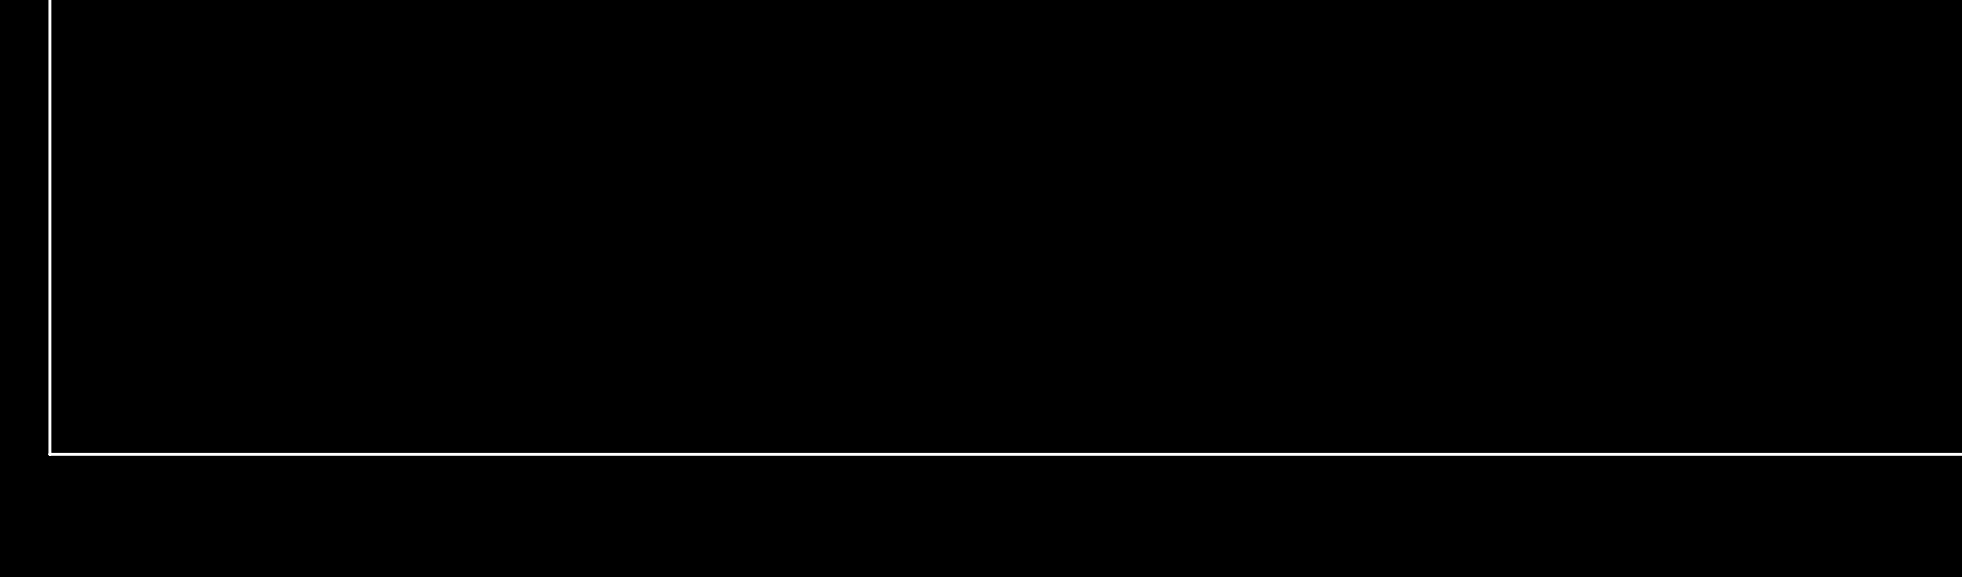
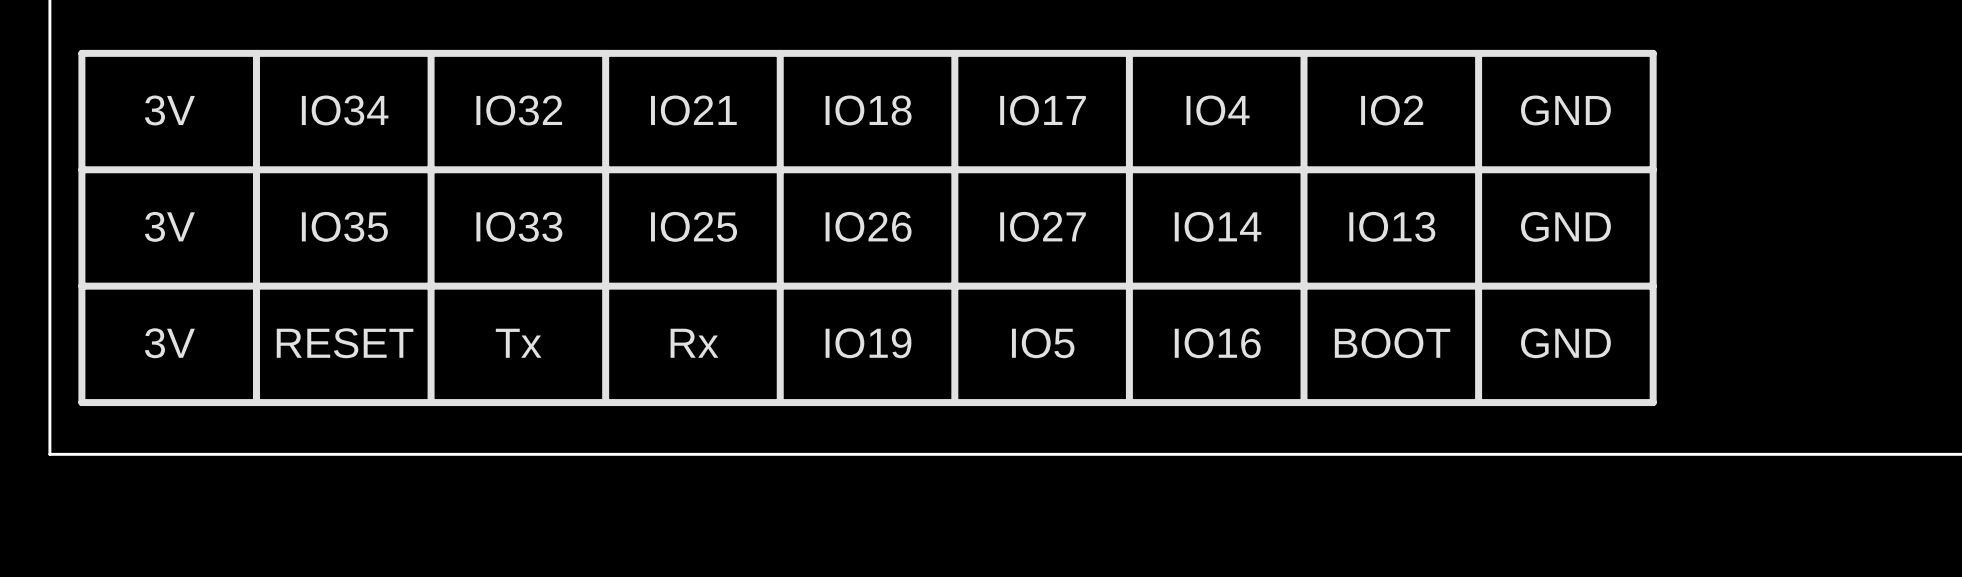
line: none -> (256, 53) (256, 402)
line: none -> (431, 53) (431, 402)
line: none -> (605, 53) (605, 402)
line: none -> (780, 53) (780, 402)
line: none -> (954, 53) (954, 402)
line: none -> (1129, 53) (1129, 402)
line: none -> (1304, 53) (1304, 402)
line: none -> (1478, 53) (1478, 402)
line: none -> (1653, 53) (1653, 402) (81, 402) (81, 53) (1653, 53)
text: none -> 3V (169, 110)
text: none -> IO34 (345, 110)
text: none -> IO32 (519, 110)
text: none -> IO21 (693, 110)
text: none -> IO18 (868, 110)
text: none -> IO17 (1043, 110)
text: none -> IO4 (1218, 110)
text: none -> IO2 (1392, 110)
text: none -> GND (1565, 110)
line: none -> (1653, 169) (81, 169)
text: none -> 3V (169, 226)
text: none -> IO35 (344, 226)
text: none -> IO33 (519, 226)
text: none -> IO25 (694, 226)
text: none -> IO26 (868, 226)
text: none -> IO27 (1043, 226)
text: none -> IO14 (1218, 226)
text: none -> IO13 (1392, 226)
text: none -> GND (1565, 226)
line: none -> (1653, 286) (81, 286)
text: none -> 3V (169, 343)
text: none -> RESET (345, 343)
text: none -> Tx (518, 343)
text: none -> Rx (694, 343)
text: none -> IO19 (868, 343)
text: none -> IO5 (1043, 343)
text: none -> IO16 (1217, 343)
text: none -> BOOT (1392, 343)
text: none -> GND (1565, 343)

